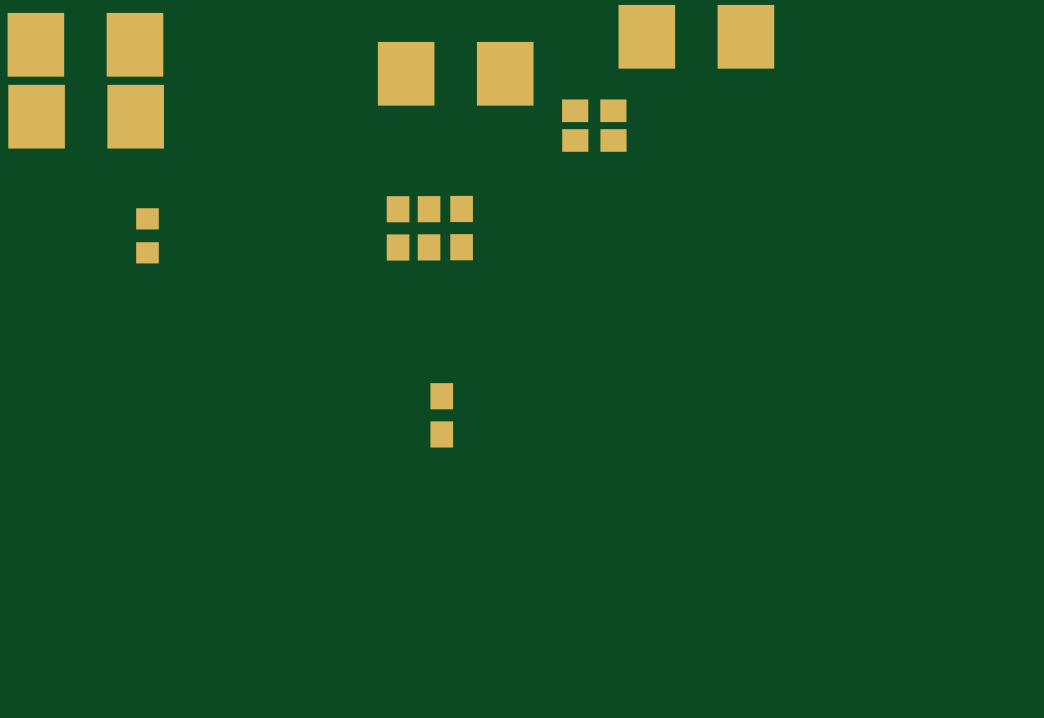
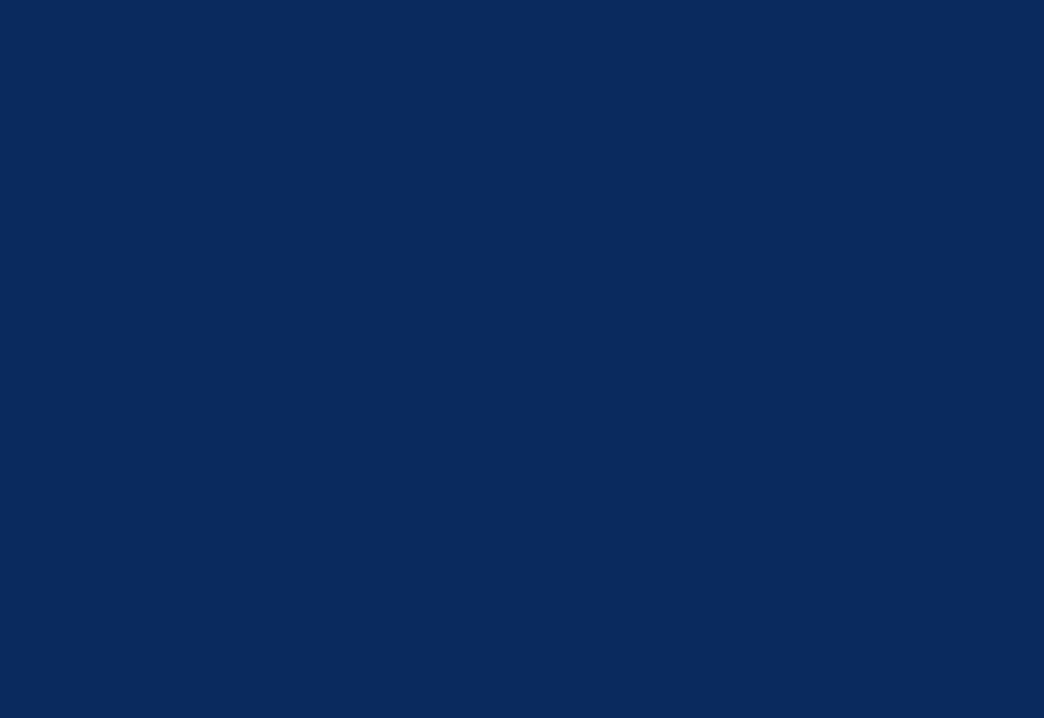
part: (696, 36) -> none
part: (85, 44) -> none
part: (455, 73) -> none
part: (594, 110) -> none
part: (86, 116) -> none
part: (594, 140) -> none
part: (398, 228) -> none
part: (429, 228) -> none
part: (461, 228) -> none
part: (147, 235) -> none
part: (441, 415) -> none

